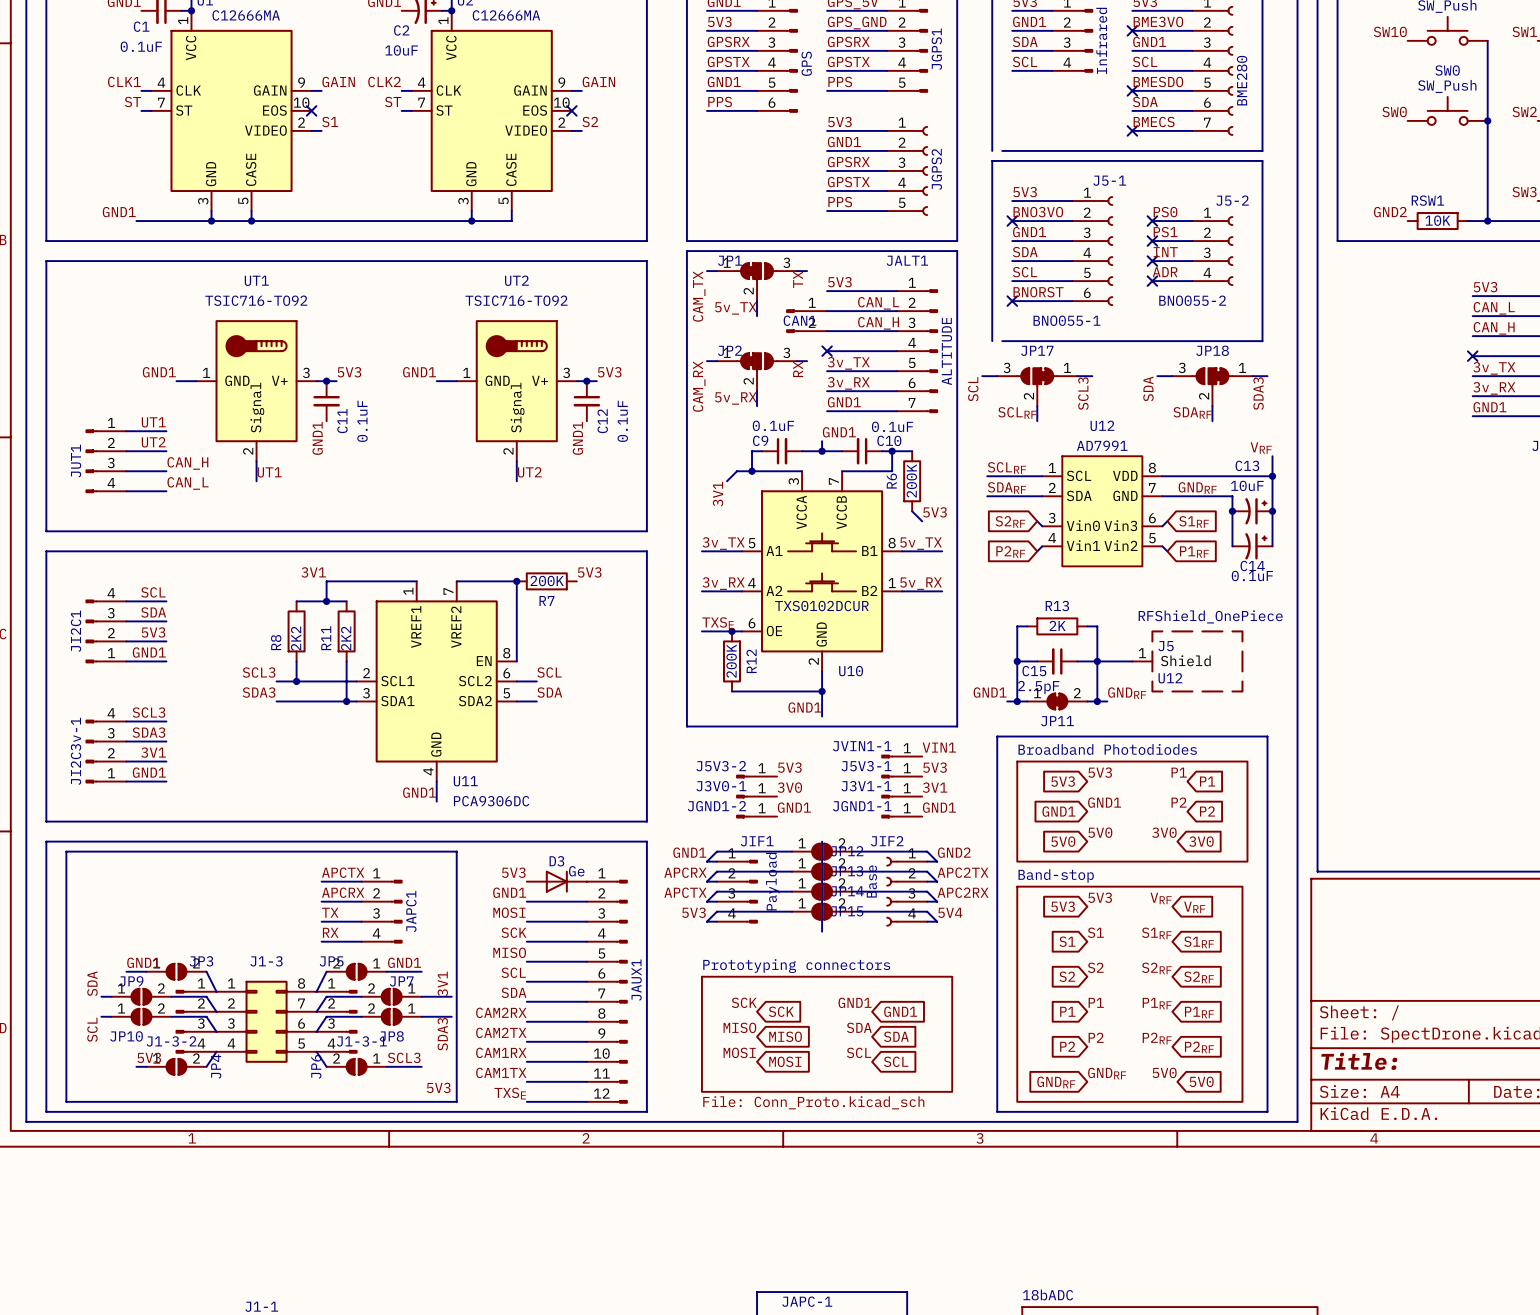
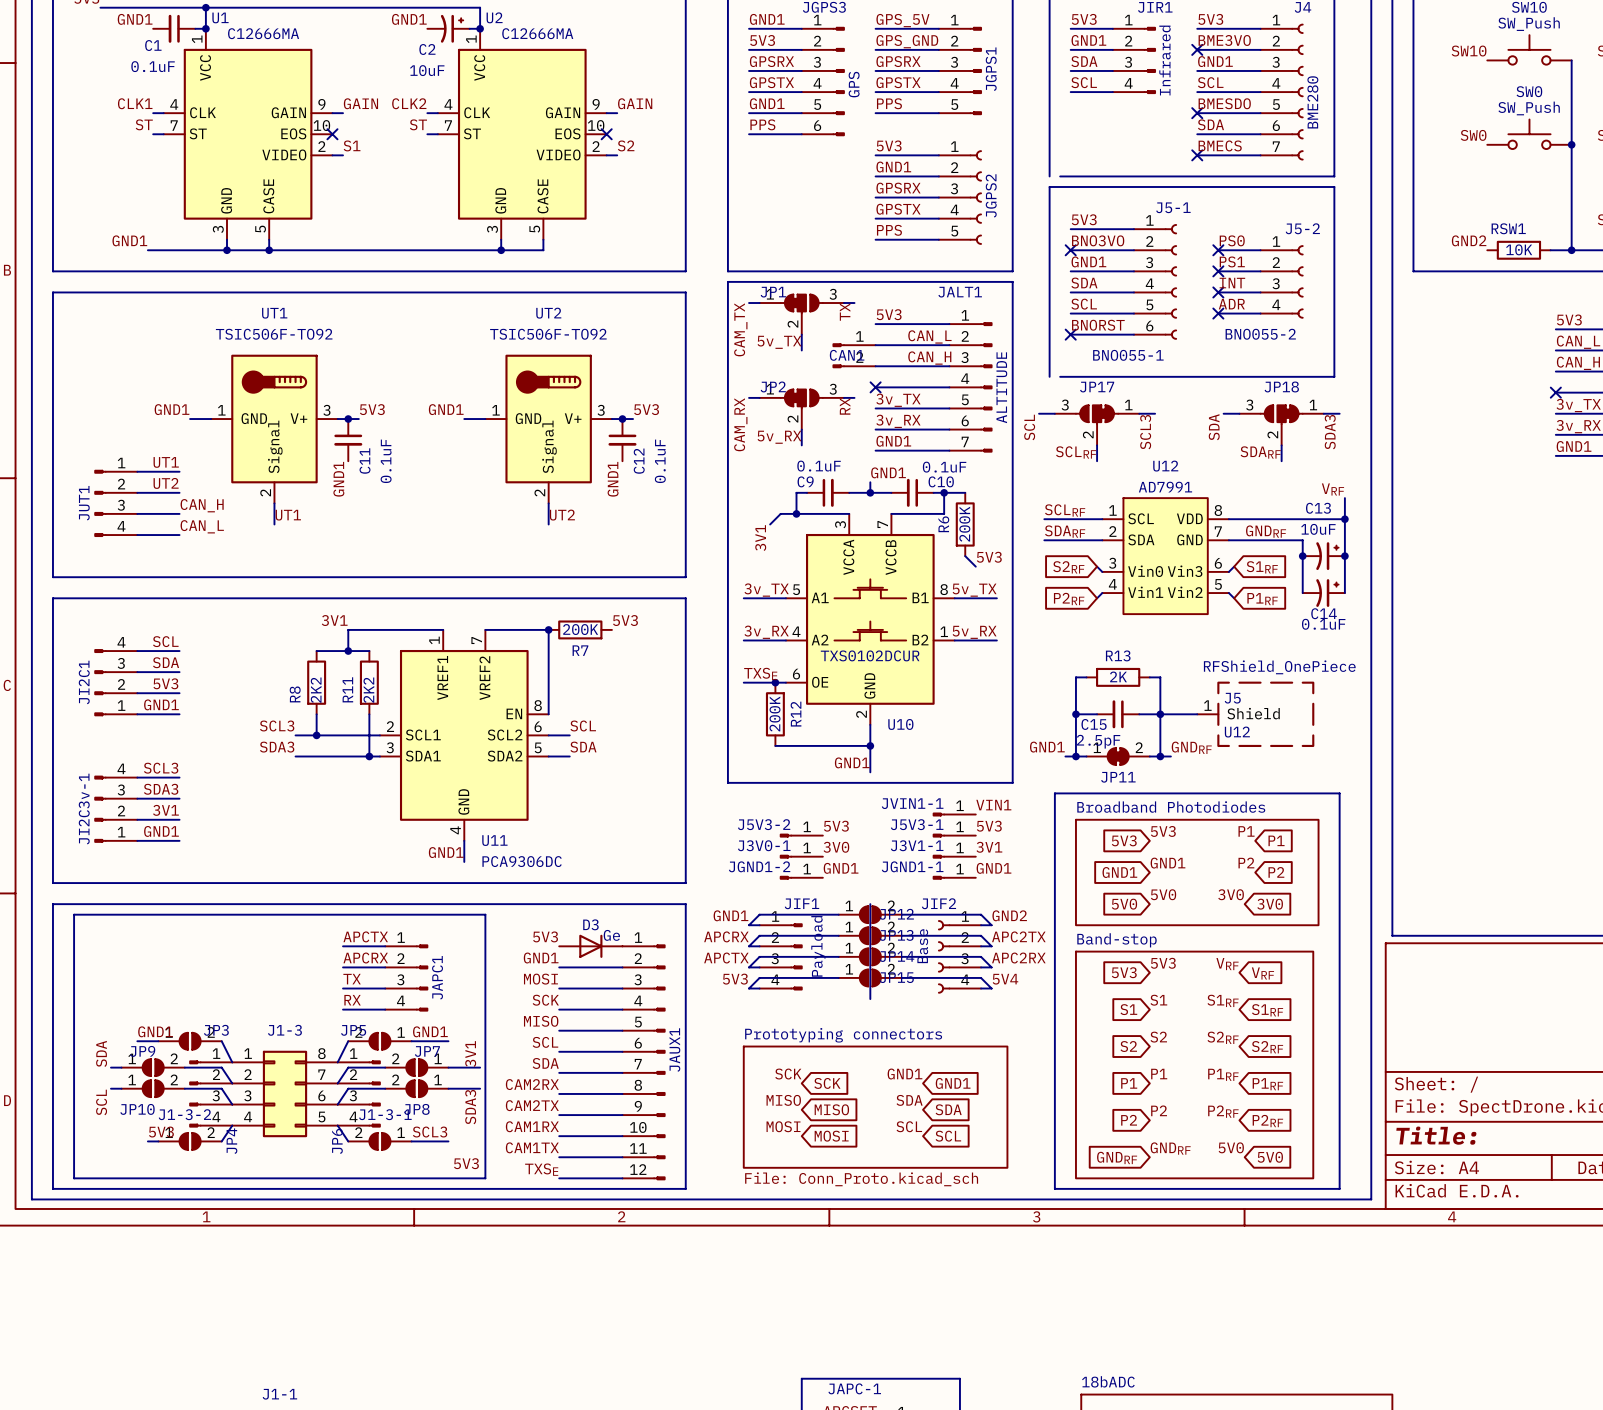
UT1 value: TSIC716-TO92 (256, 300) -> TSIC506F-TO92 (274, 334)
UT2 value: TSIC716-TO92 (516, 300) -> TSIC506F-TO92 (548, 334)

